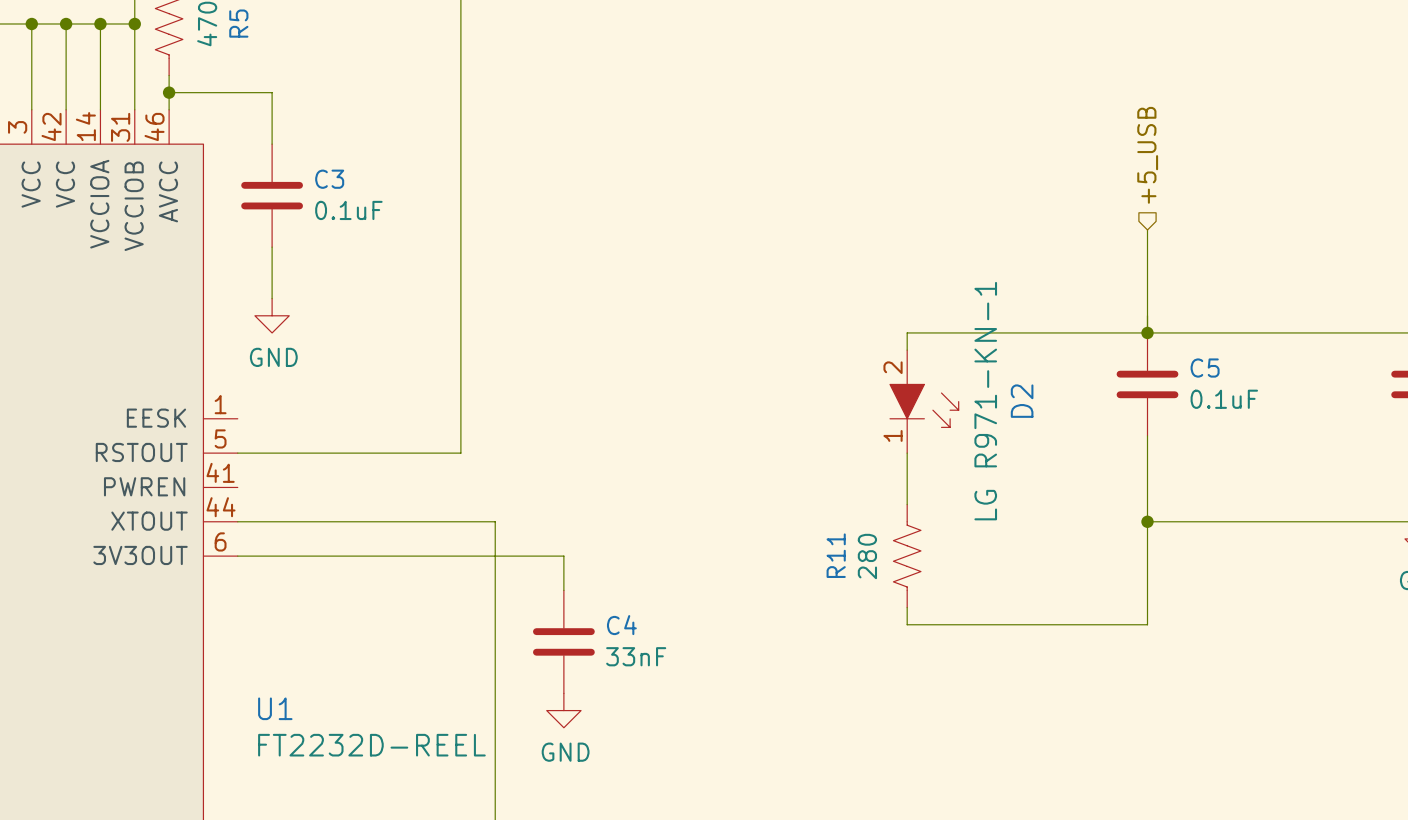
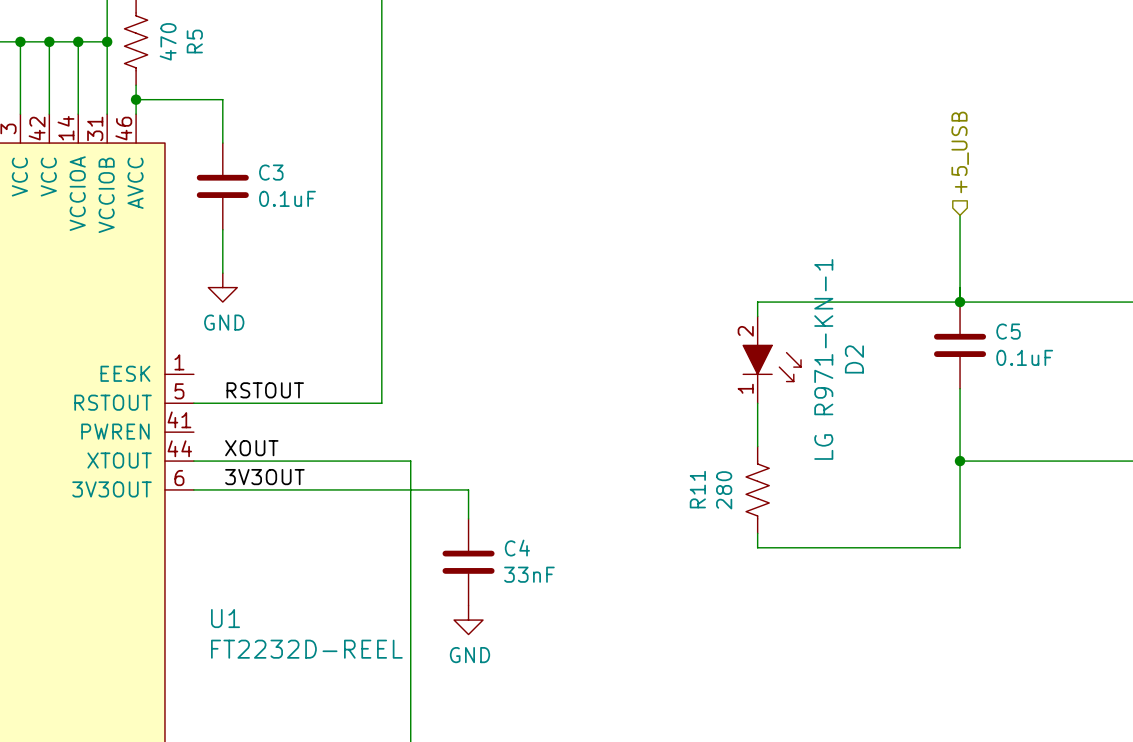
label: none -> RSTOUT (265, 390)
label: none -> XOUT (251, 448)
label: none -> 3V3OUT (264, 477)

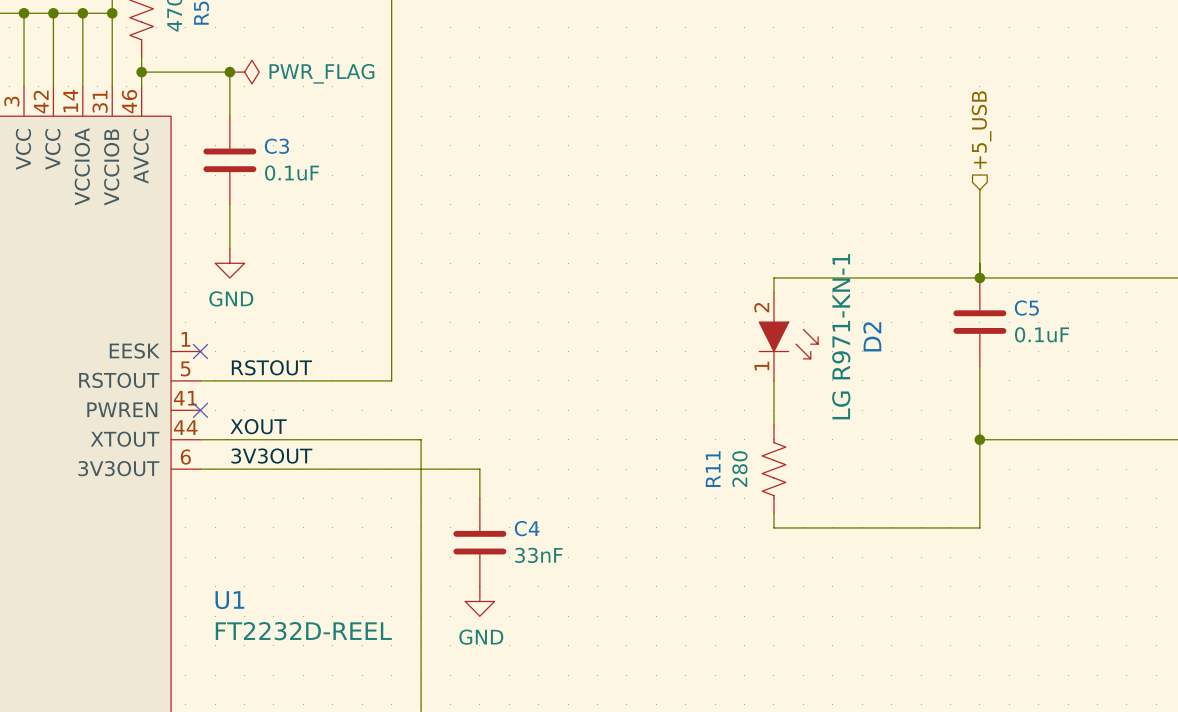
junction: none -> (229, 72)
power symbol: none -> PWR_FLAG (244, 72)
no-connect mark: none -> (200, 351)
no-connect mark: none -> (200, 410)

